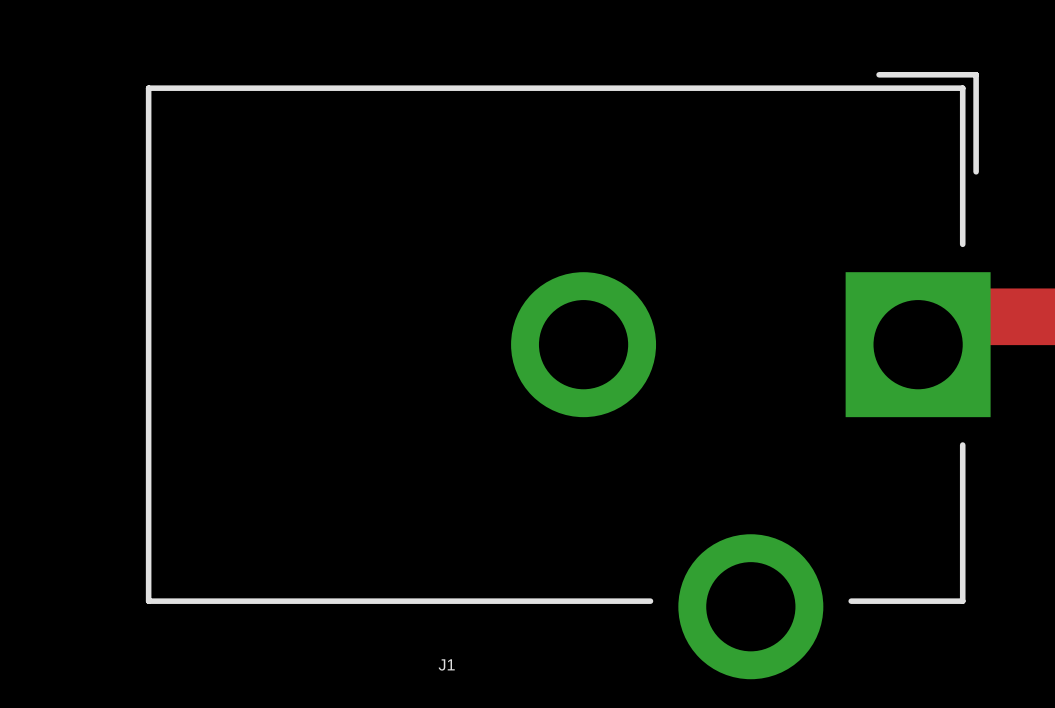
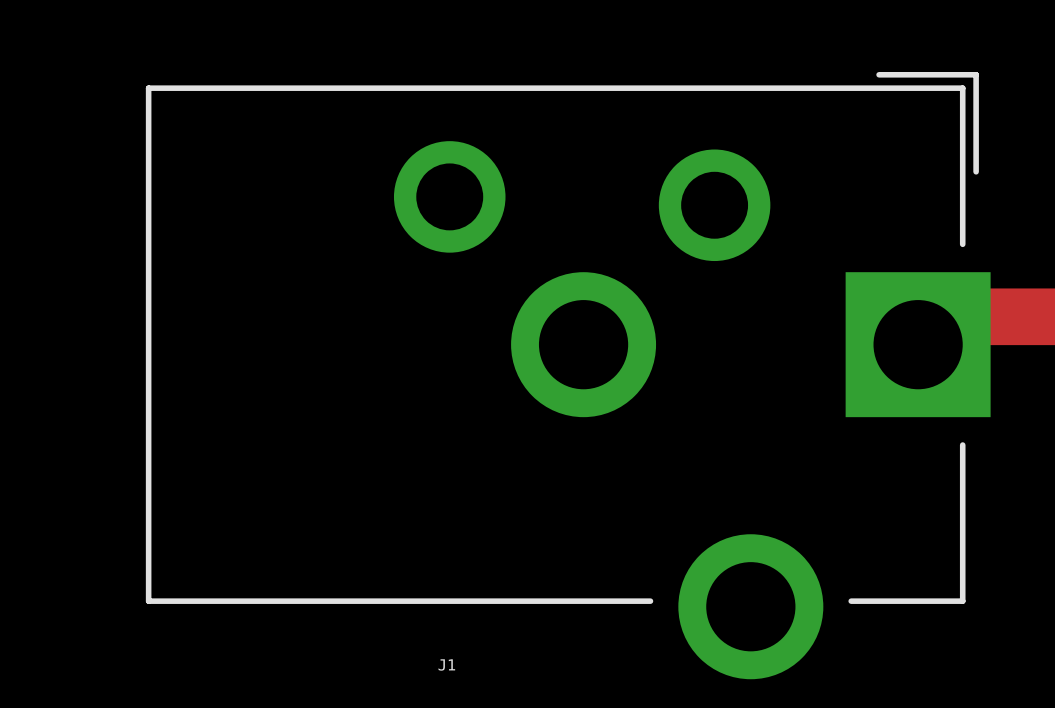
via: none -> (449, 196)
via: none -> (714, 205)

